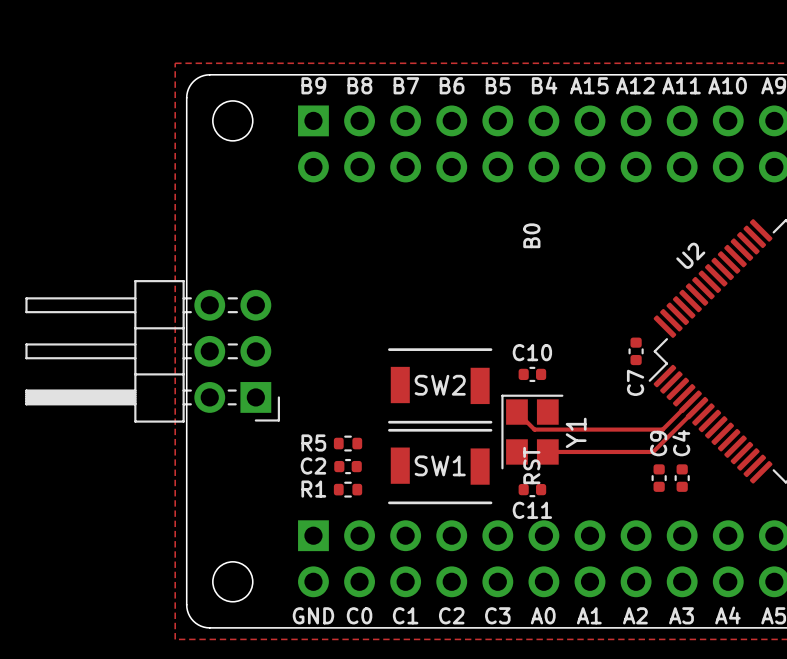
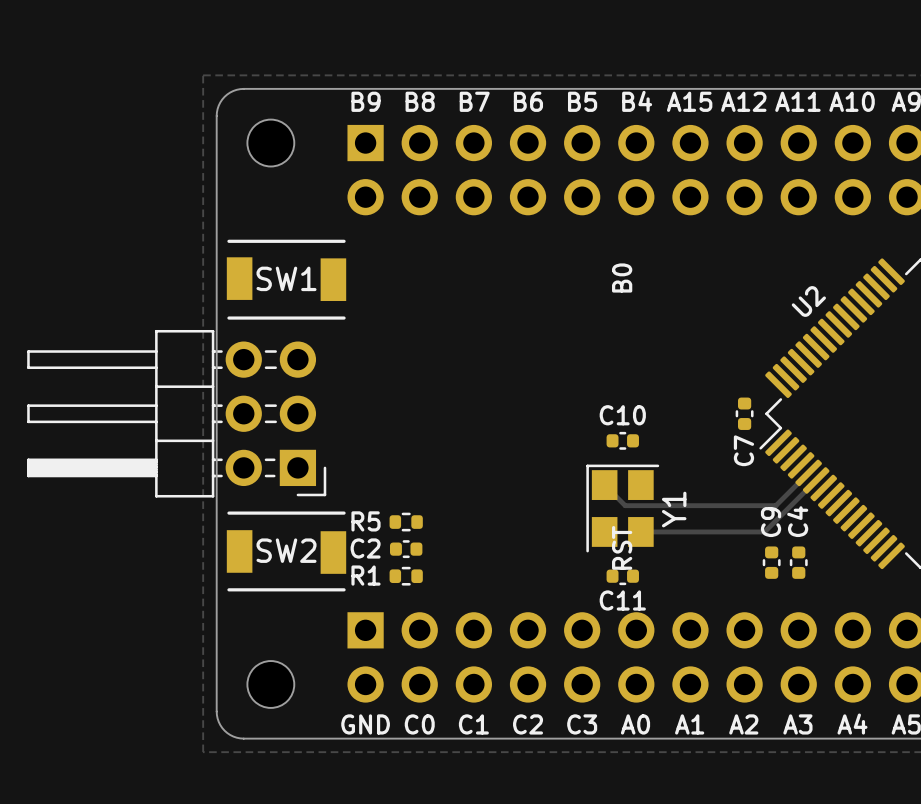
SW2 footprint: [388, 348, 493, 424] -> [226, 511, 347, 592]
SW1 footprint: [388, 428, 493, 505] -> [226, 239, 347, 320]

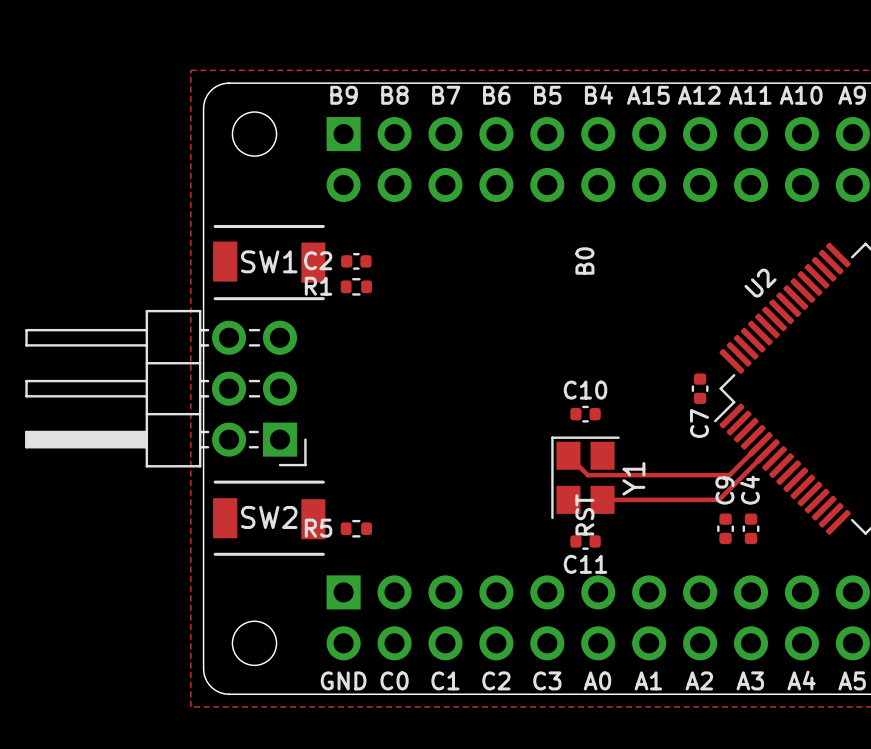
R5 position: (406, 522) -> (356, 528)
C2 position: (406, 549) -> (356, 261)
R1 position: (406, 576) -> (356, 286)

